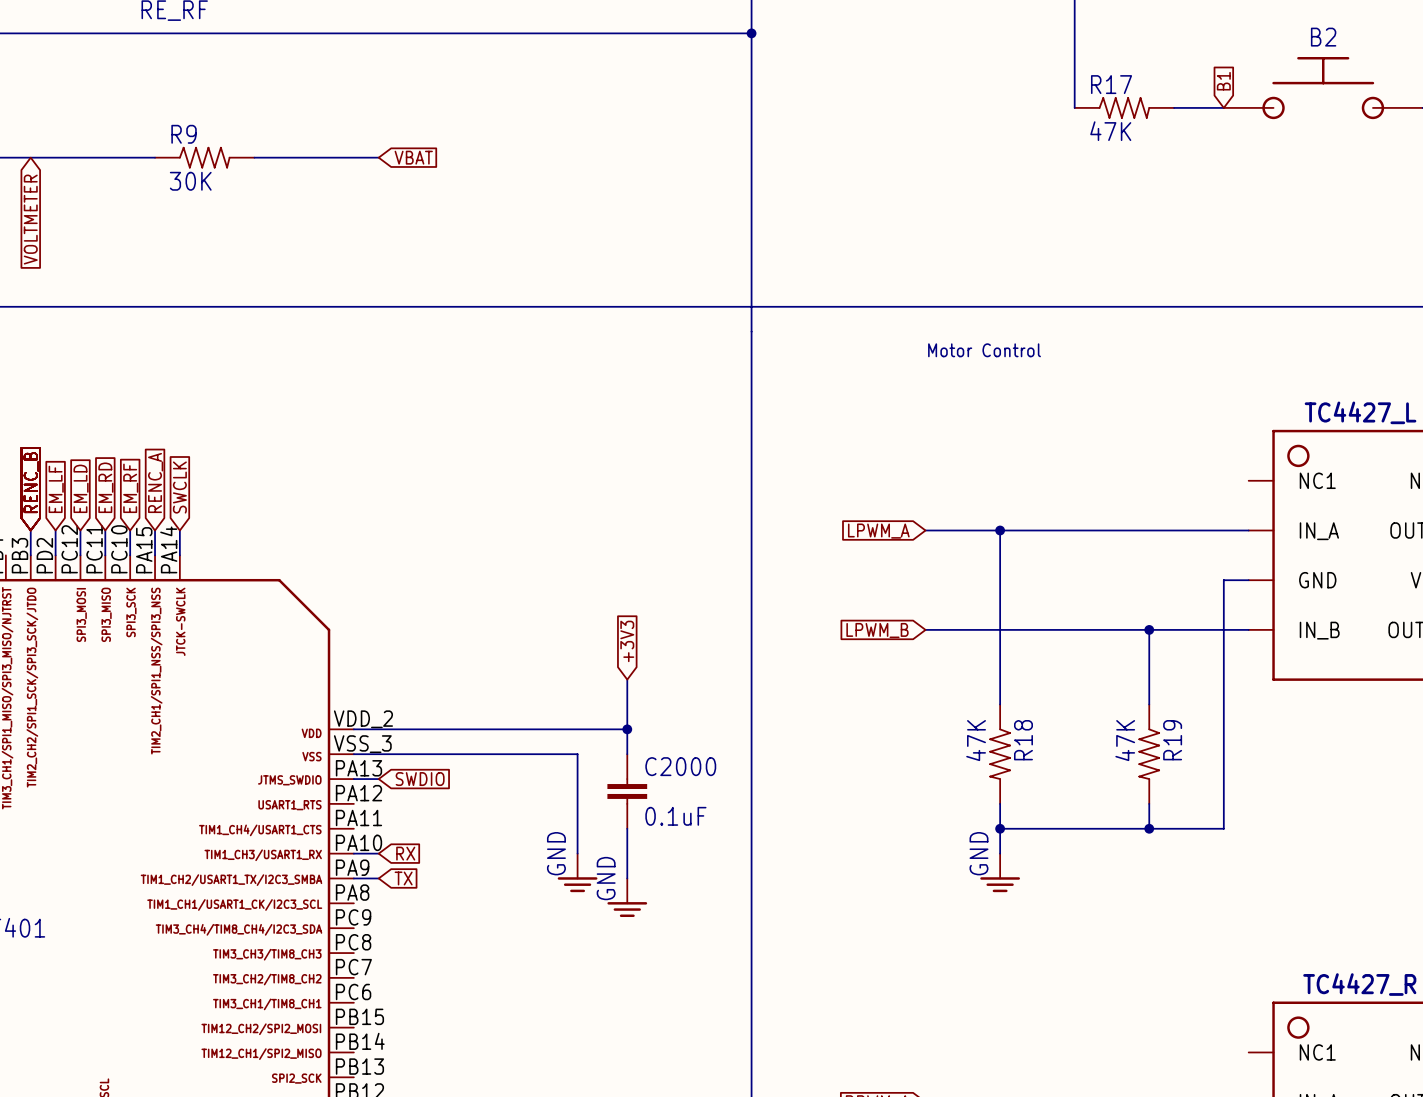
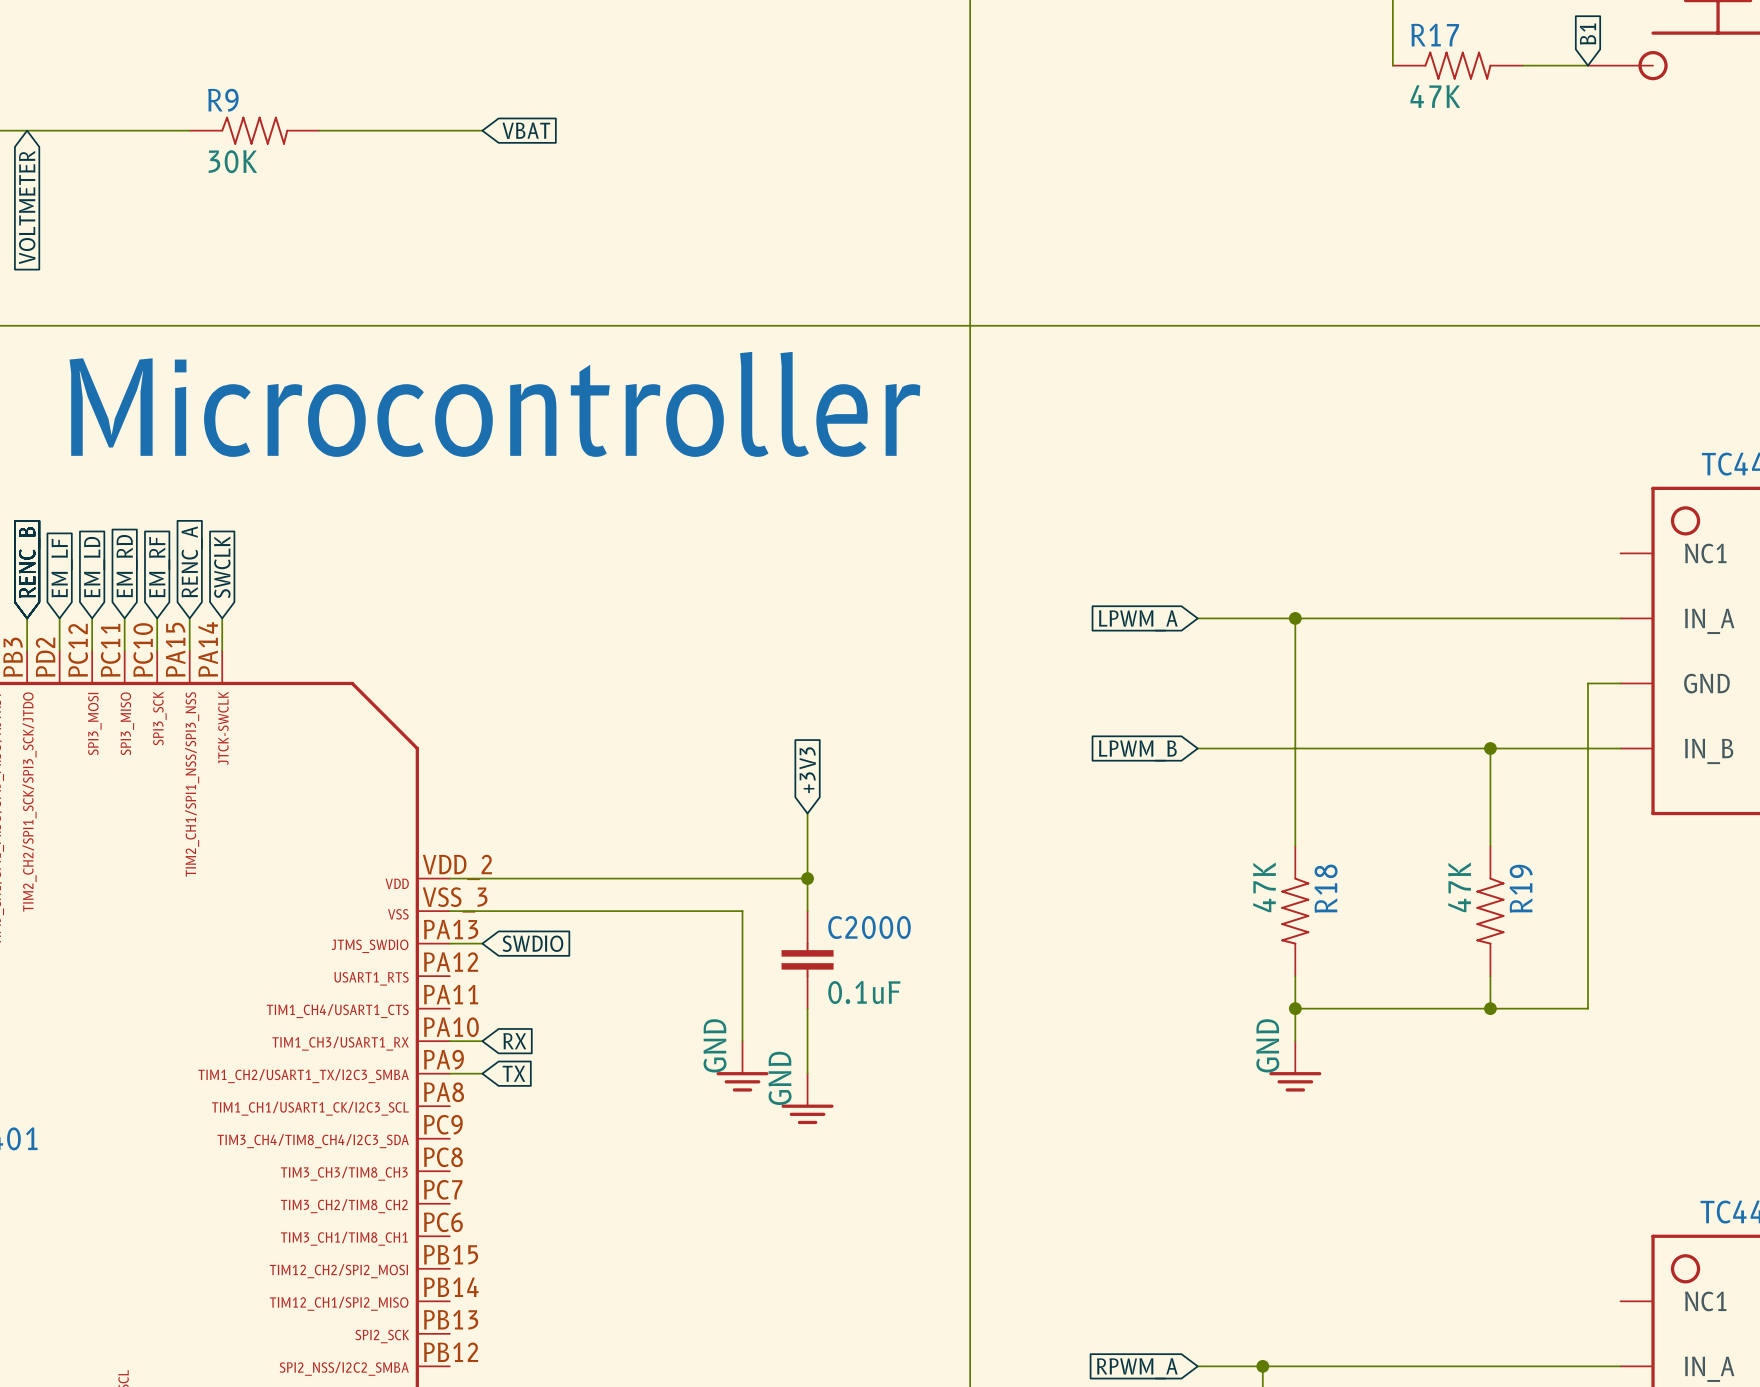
text: Motor Control (984, 350) -> none
text: none -> Microcontroller (494, 404)

